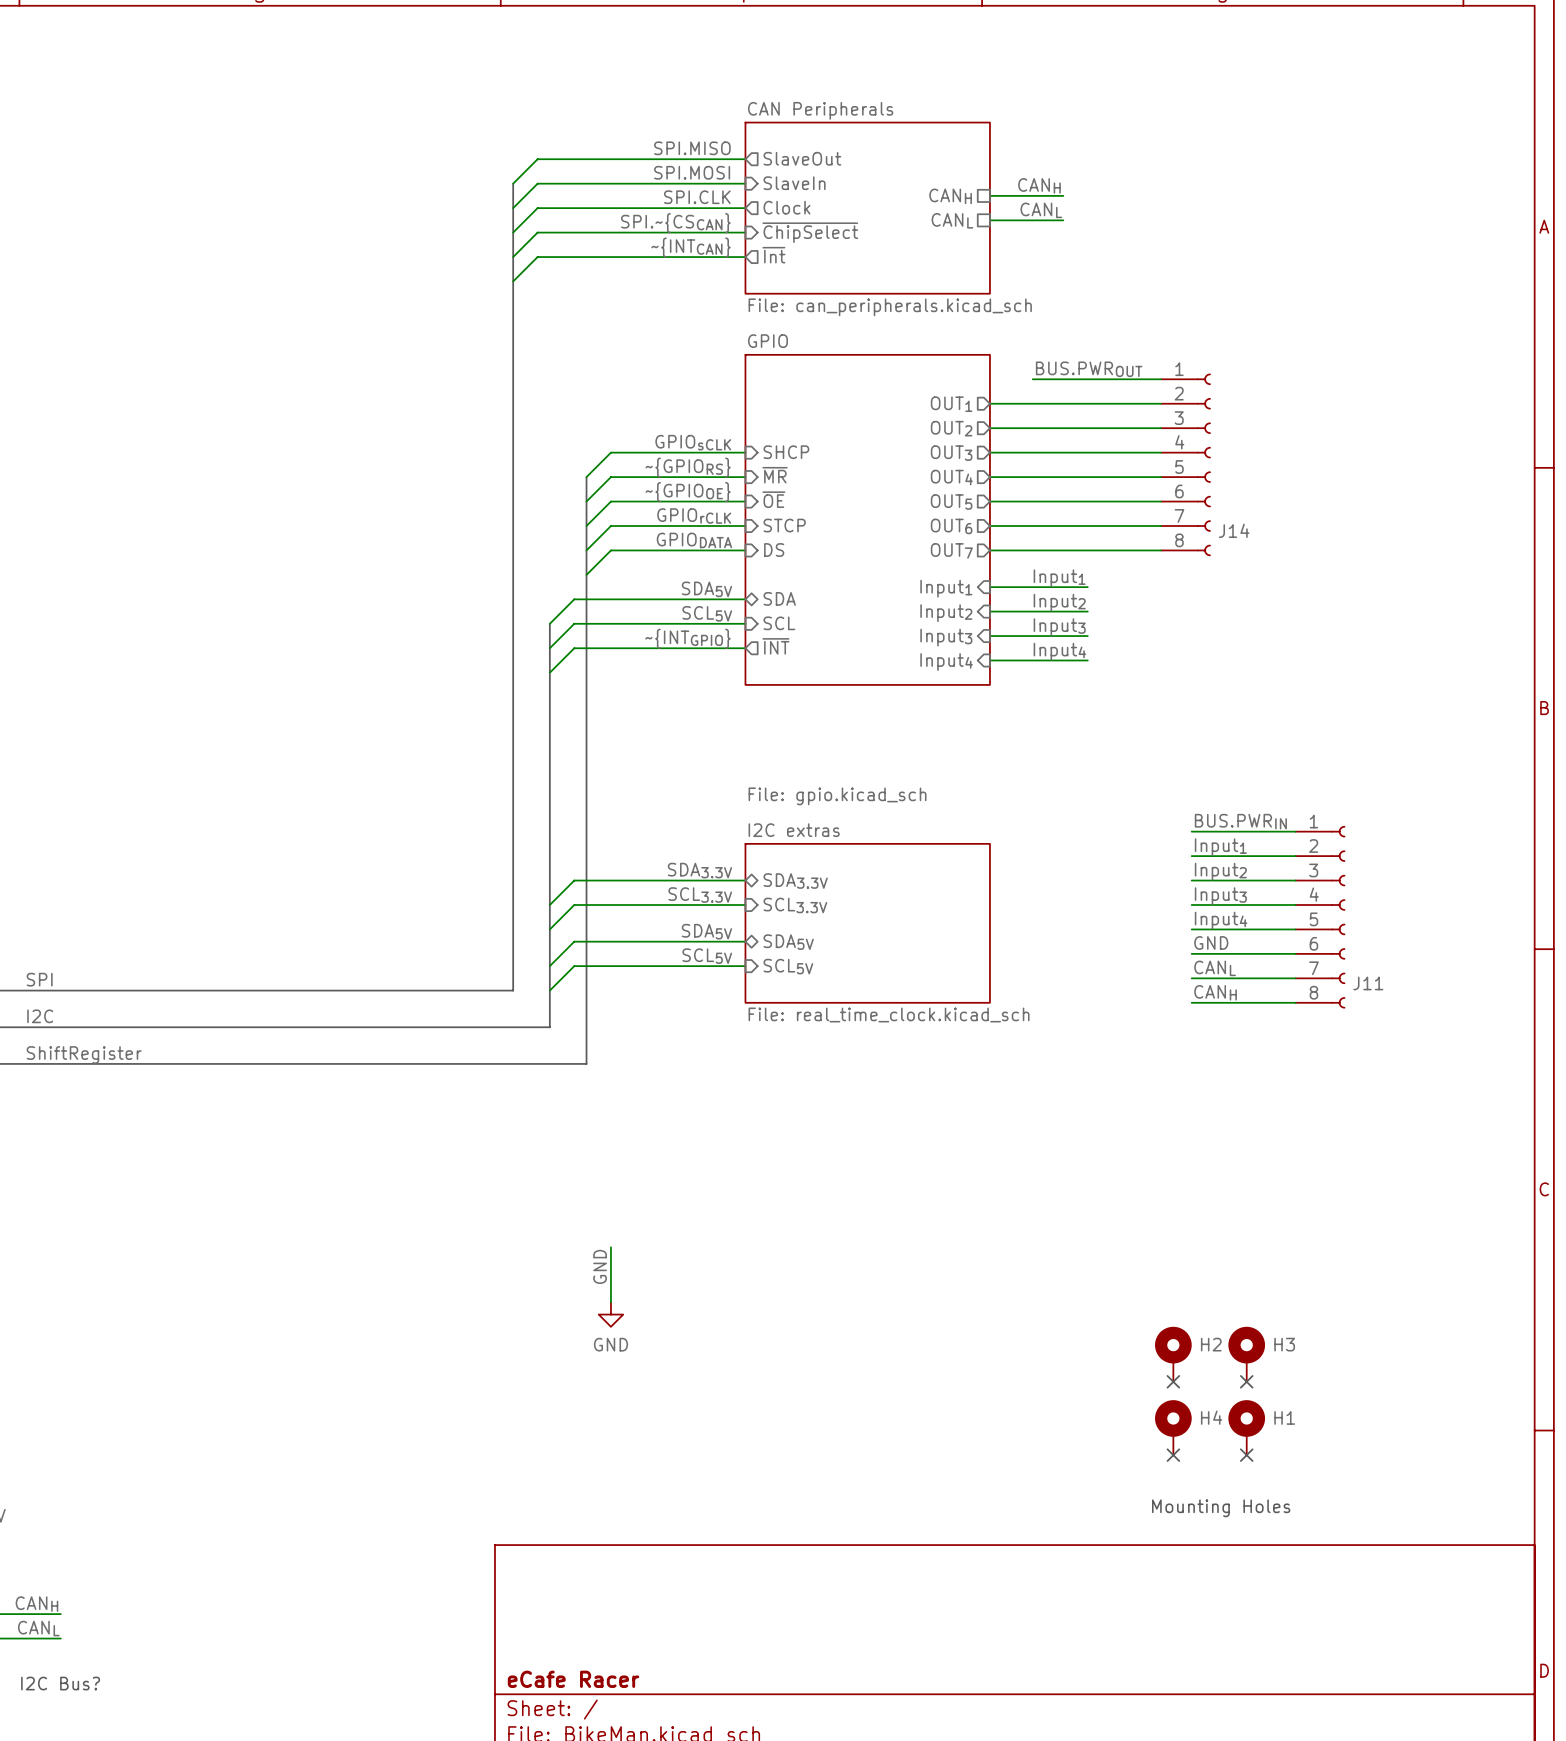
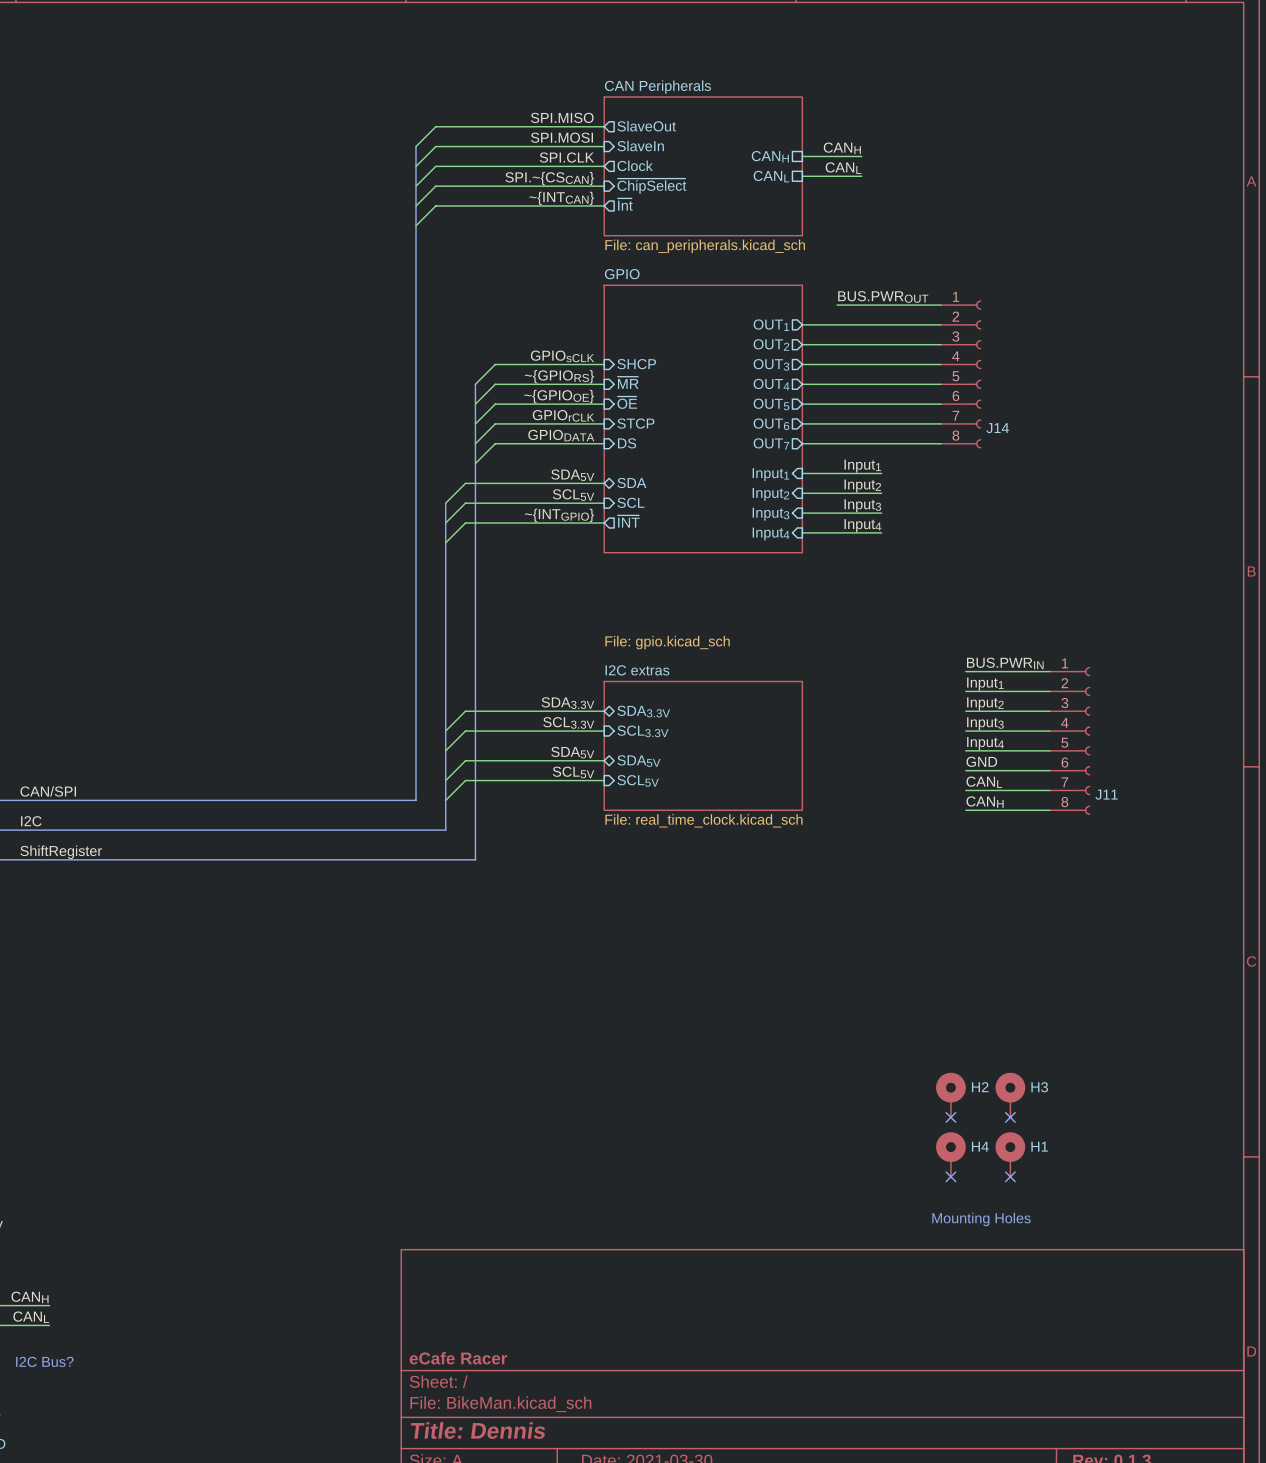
label: SPI (39, 979) -> CAN/SPI (48, 791)
wire: (610, 1247) (610, 1302) -> none
label: GND (600, 1266) -> none
power symbol: GND (610, 1314) -> none

